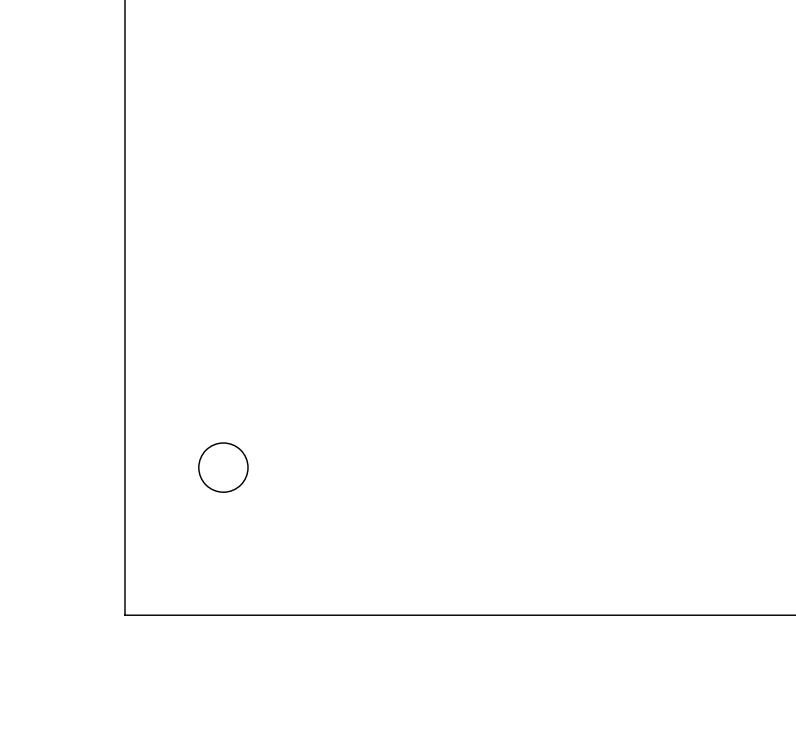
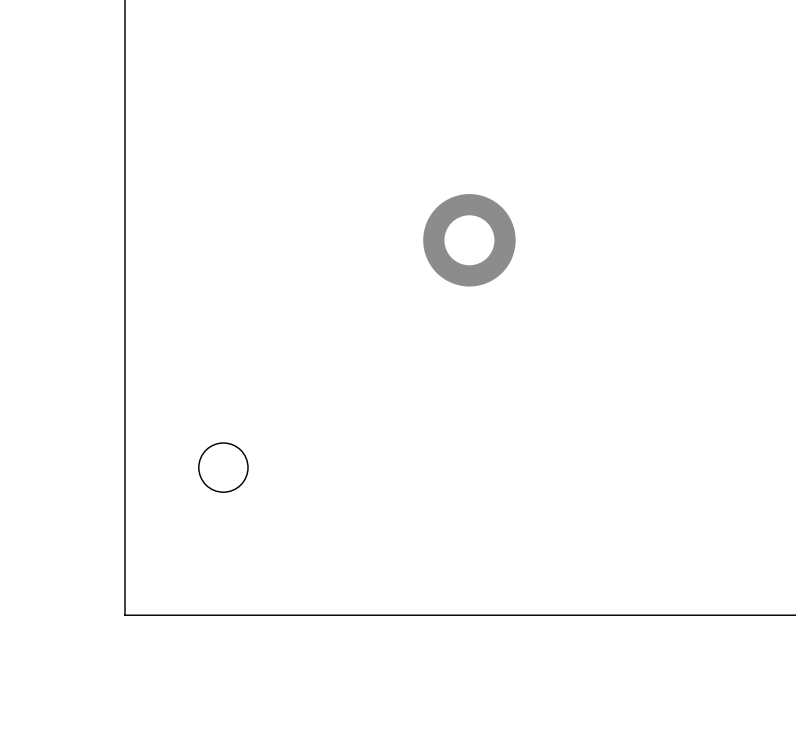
part: none -> (469, 240)

